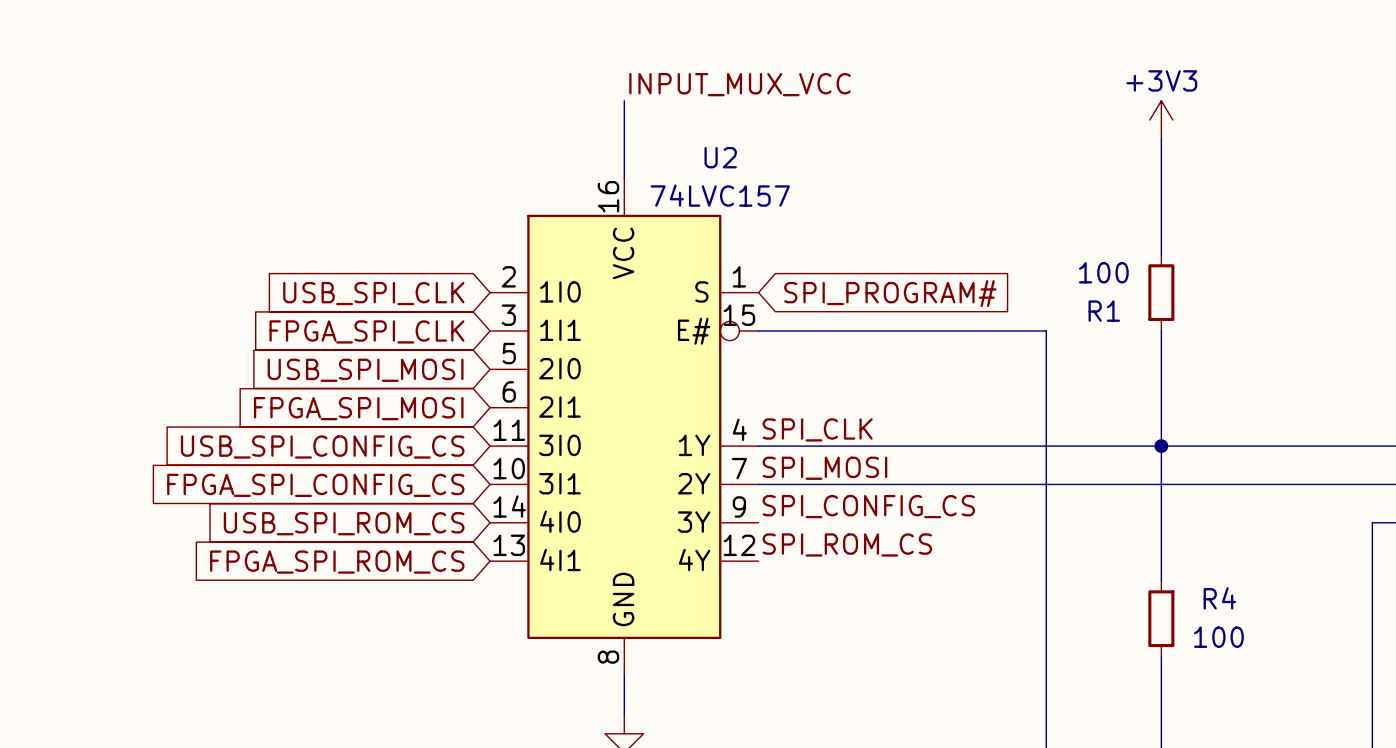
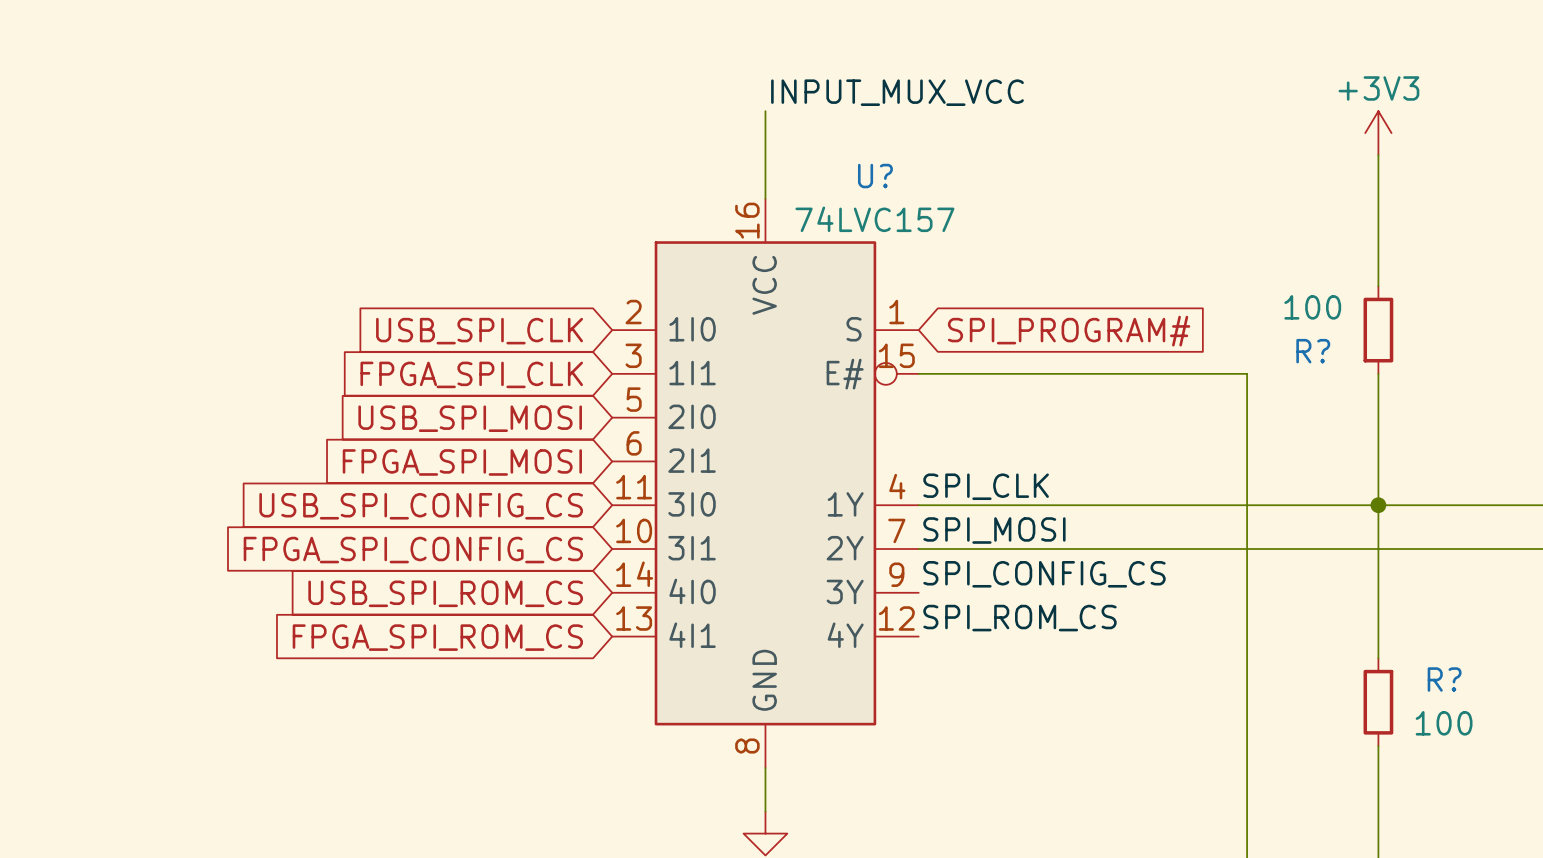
U2 name: U2 (720, 157) -> U? (875, 176)
R1 name: R1 (1104, 311) -> R? (1313, 351)
R4 name: R4 (1219, 598) -> R? (1444, 679)

